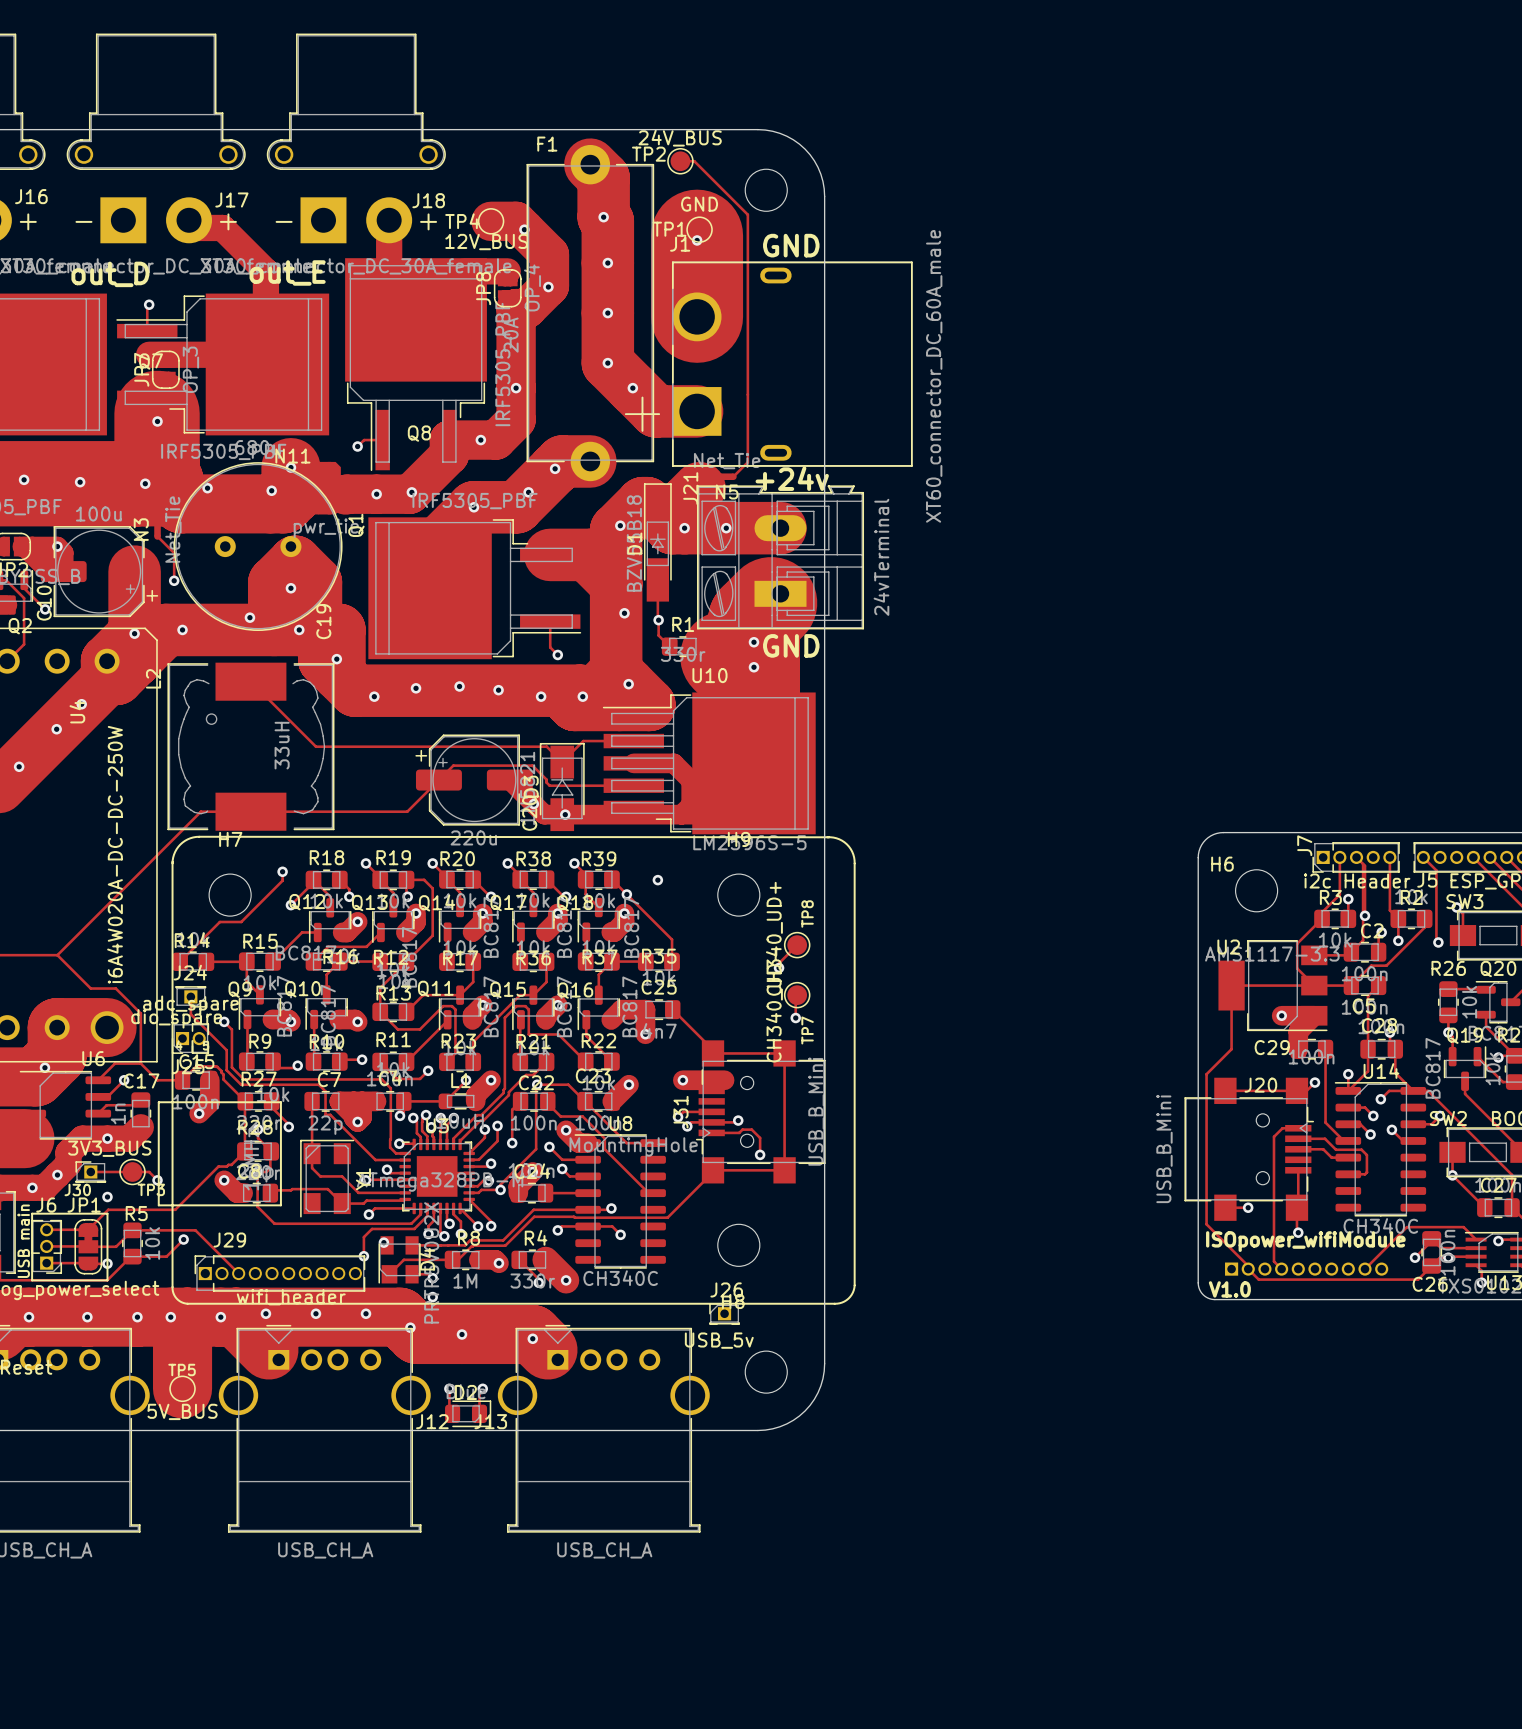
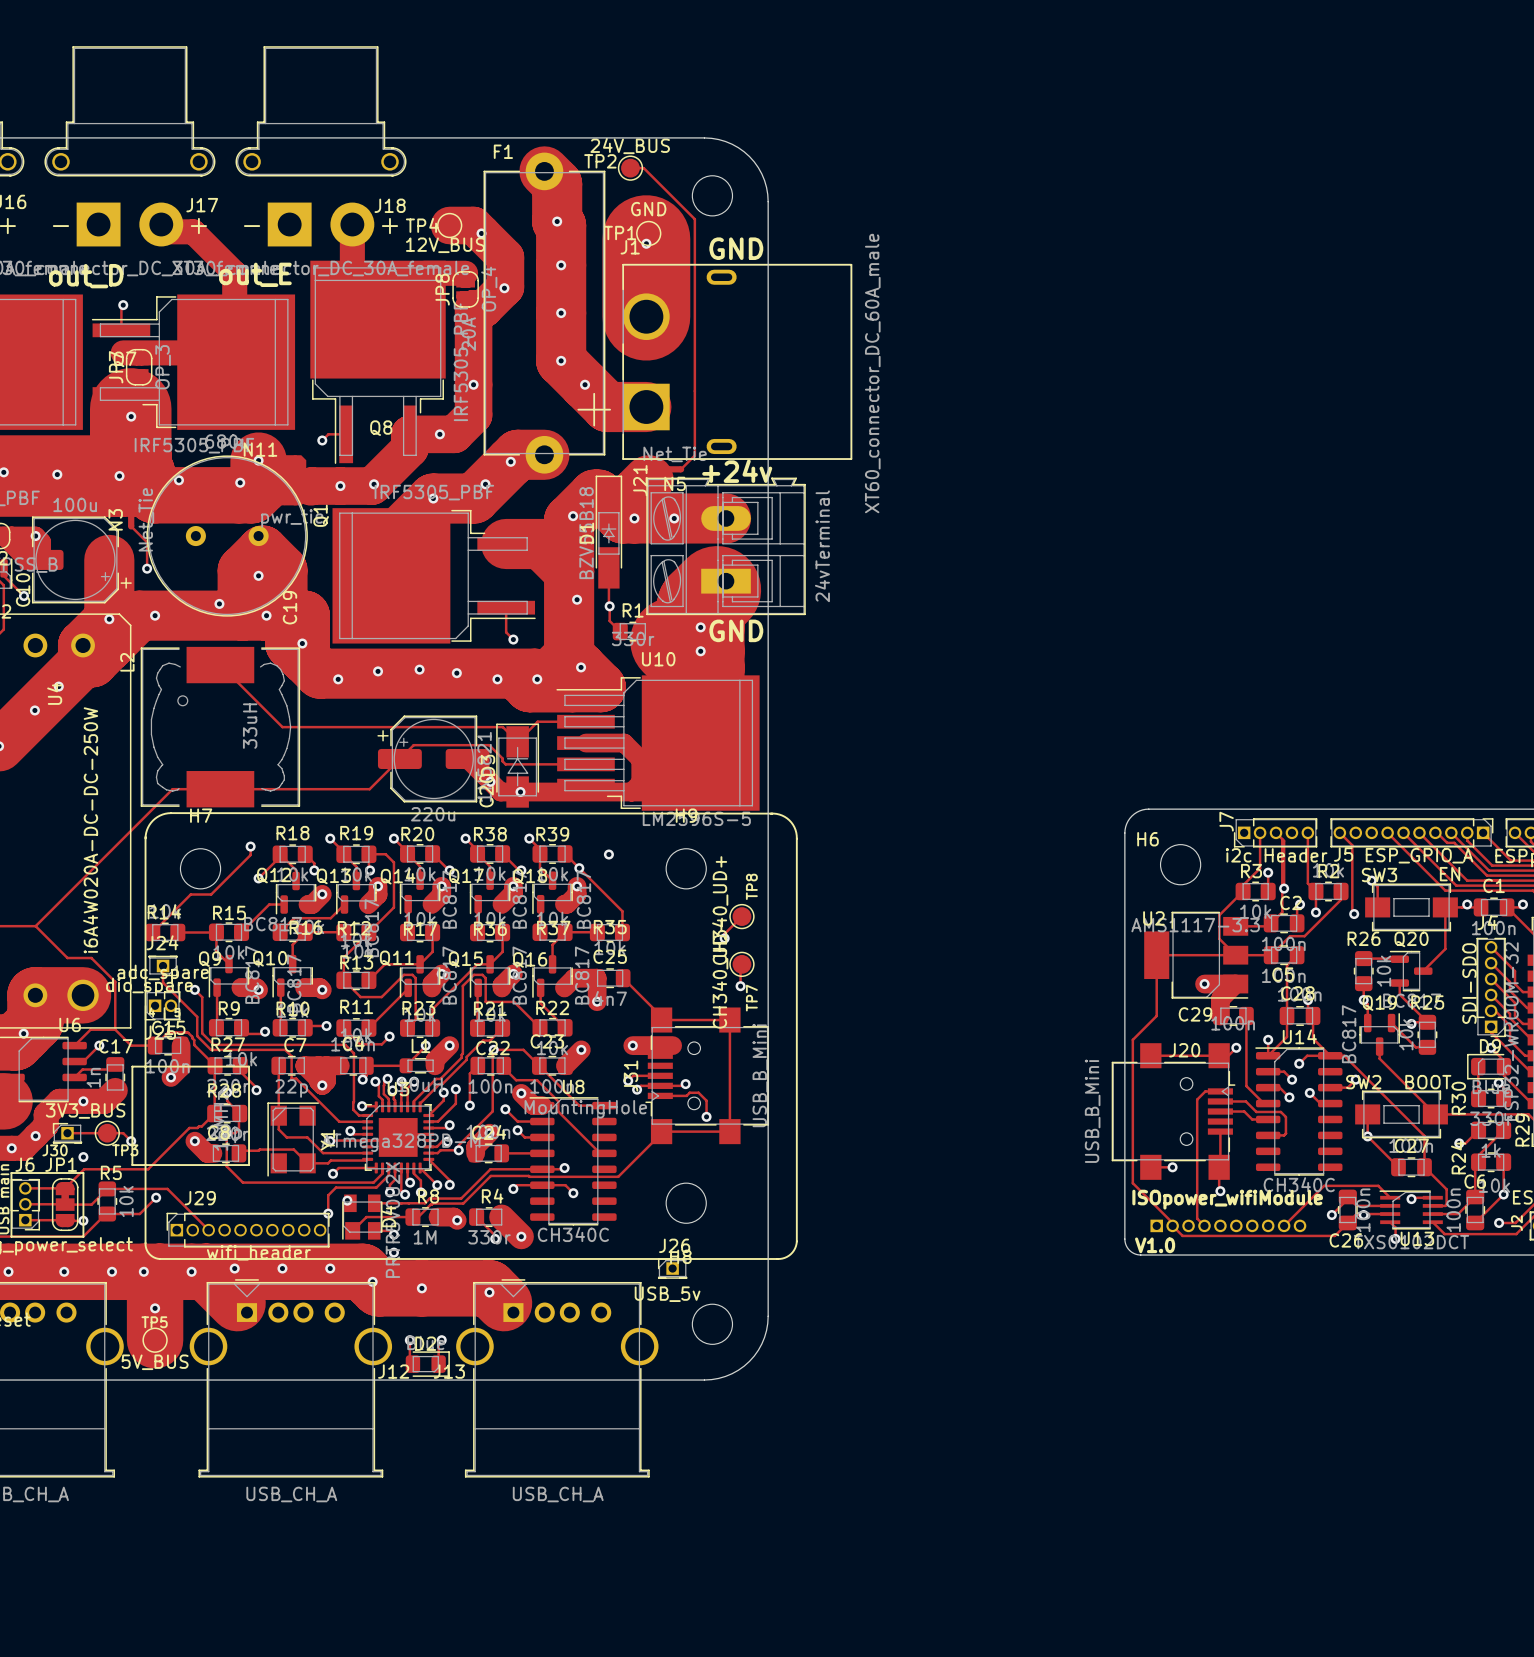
via: none -> (155, 1308)

